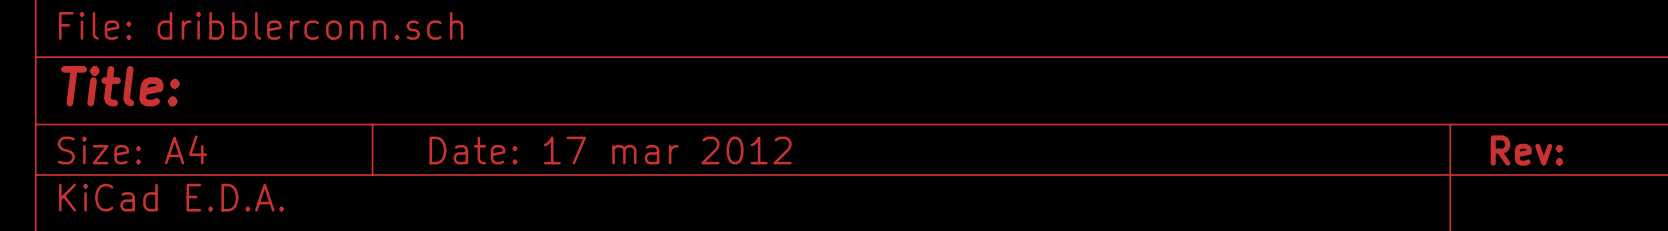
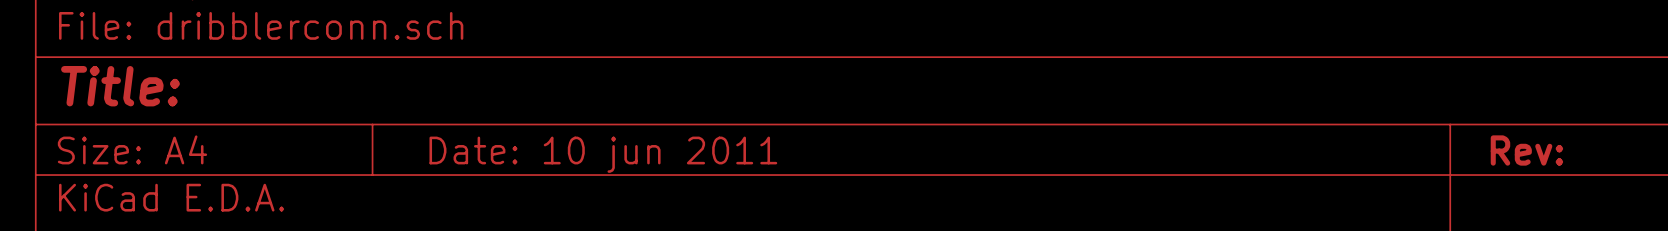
title block: Date: 17 mar 2012 (610, 150) -> Date: 10 jun 2011 (603, 154)

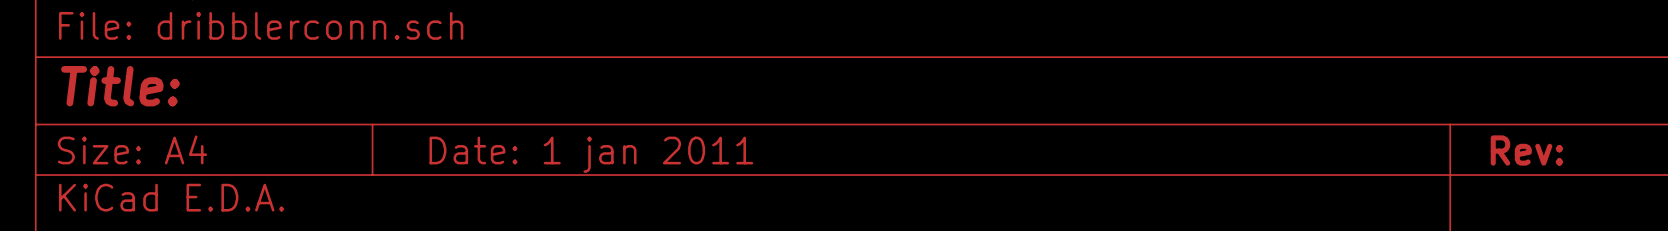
title block: Date: 10 jun 2011 (603, 154) -> Date: 1 jan 2011 (591, 154)

